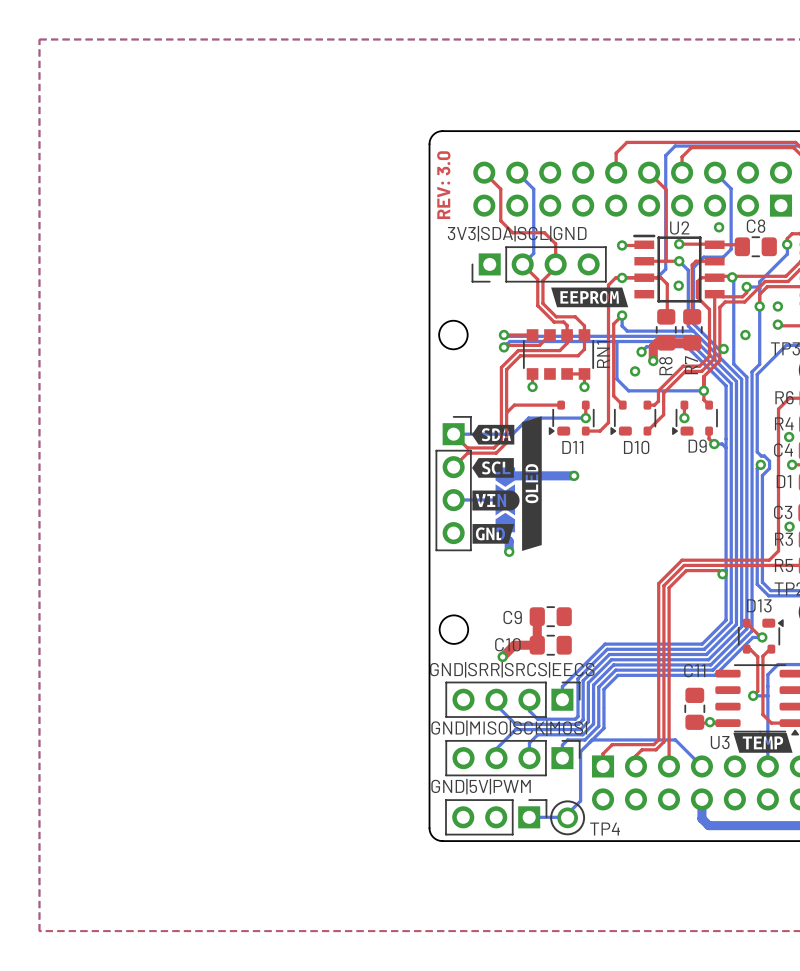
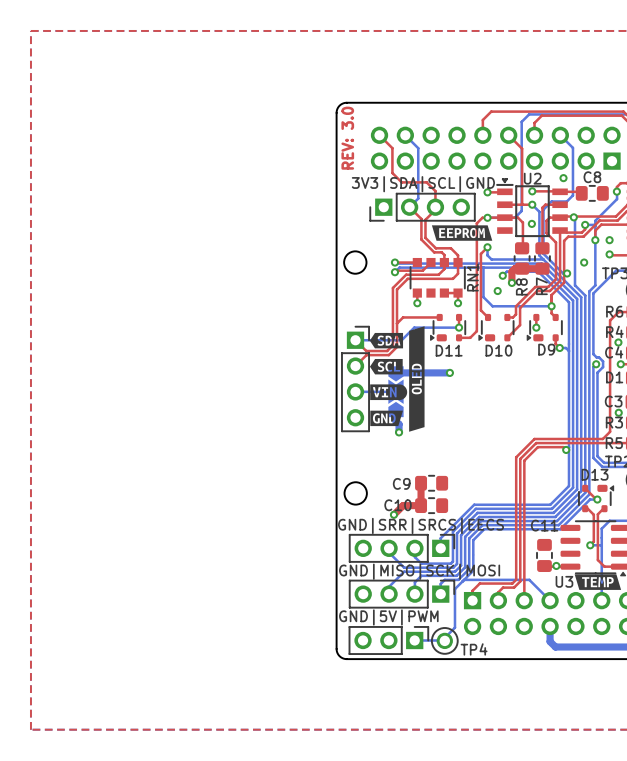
line: none -> (506, 179) (504, 182) (502, 179) (506, 179)

